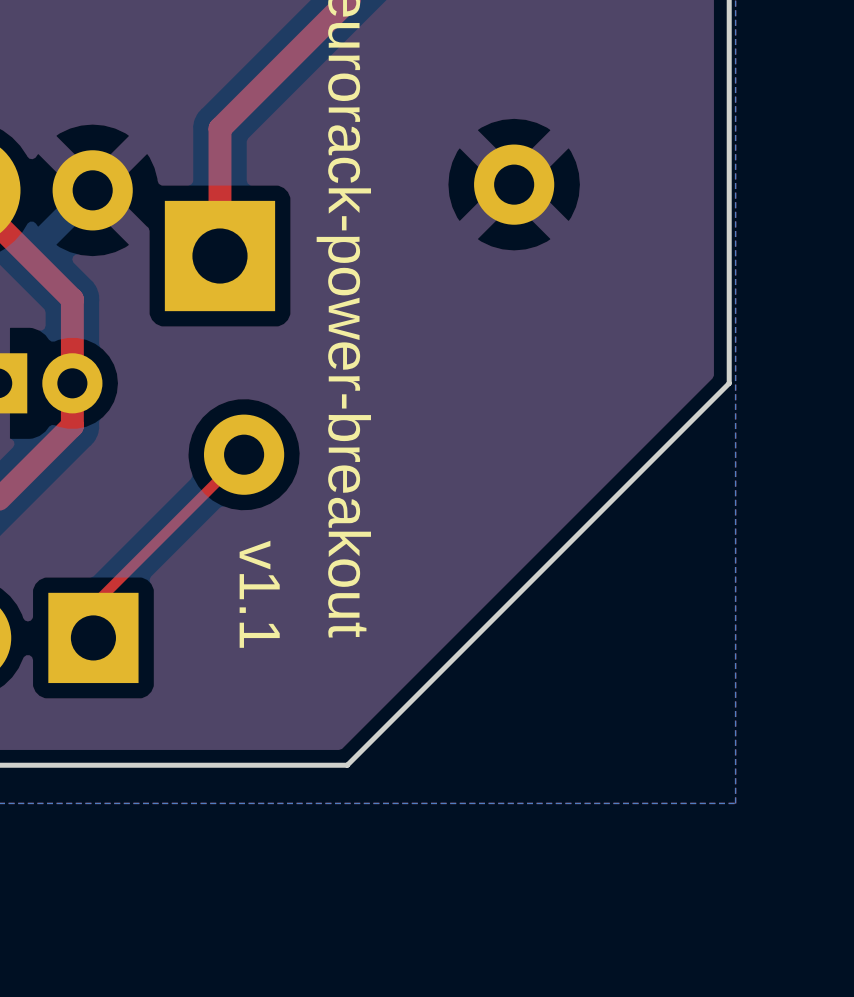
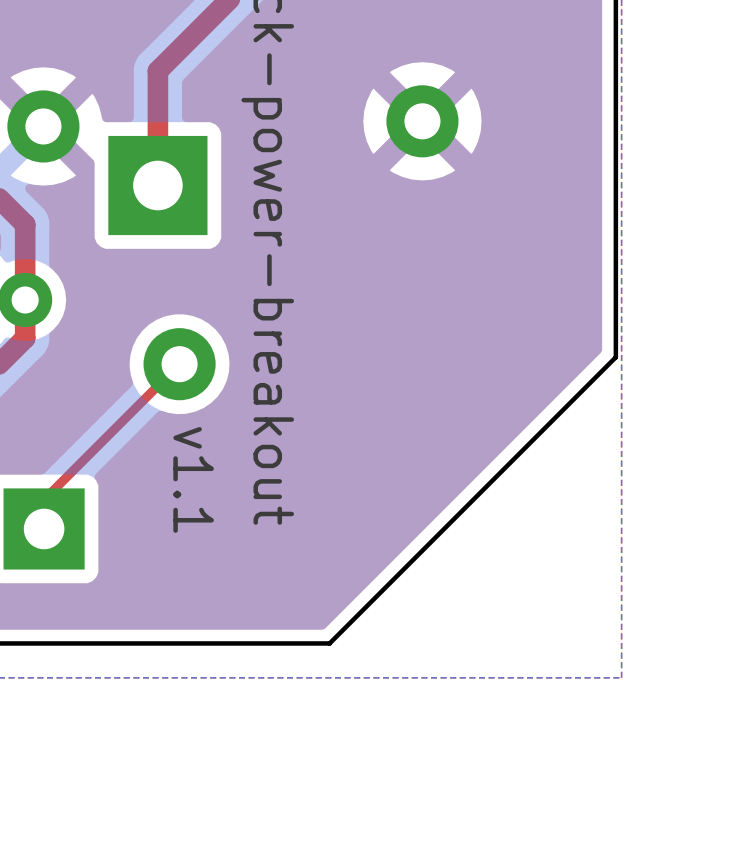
board edge: (729, 383) (347, 765) -> (615, 300) (615, 357) (329, 643) (272, 643)

